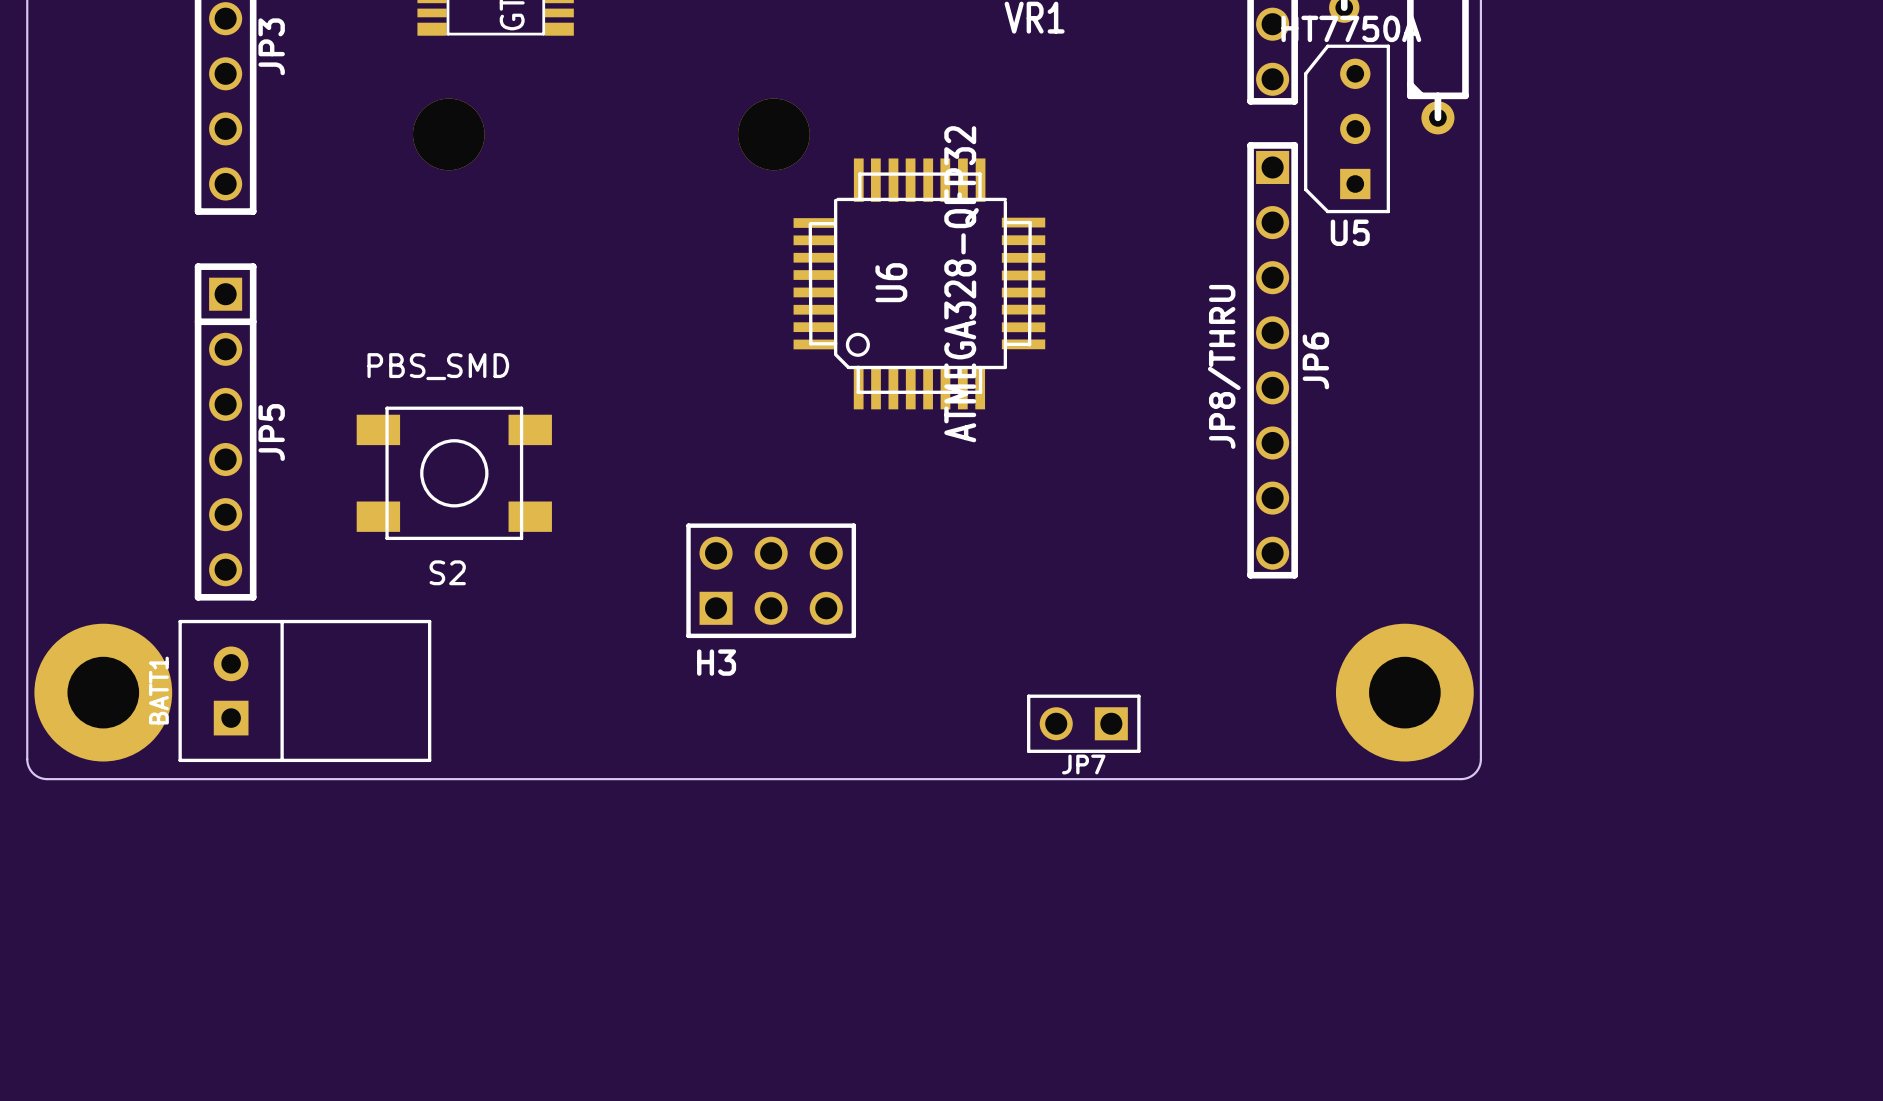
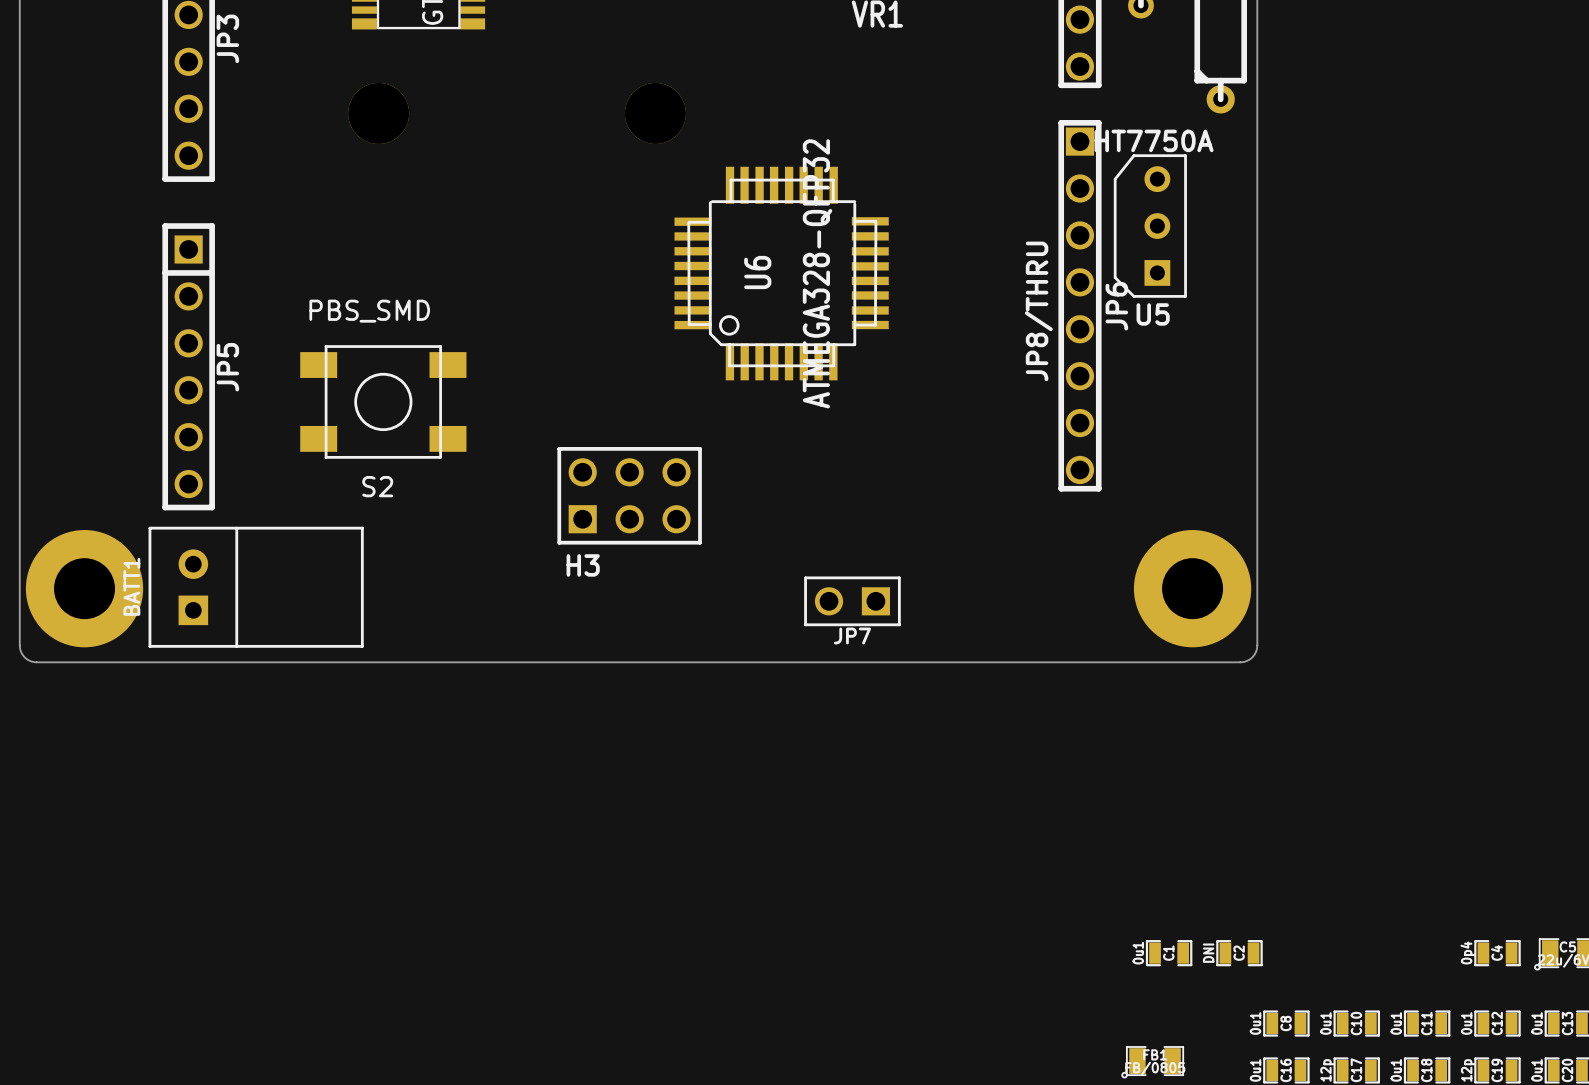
U5 position: (1347, 128) -> (1150, 226)
U6 position: (919, 283) -> (781, 273)
H3 position: (771, 580) -> (629, 495)
JP7 position: (1083, 723) -> (852, 601)

